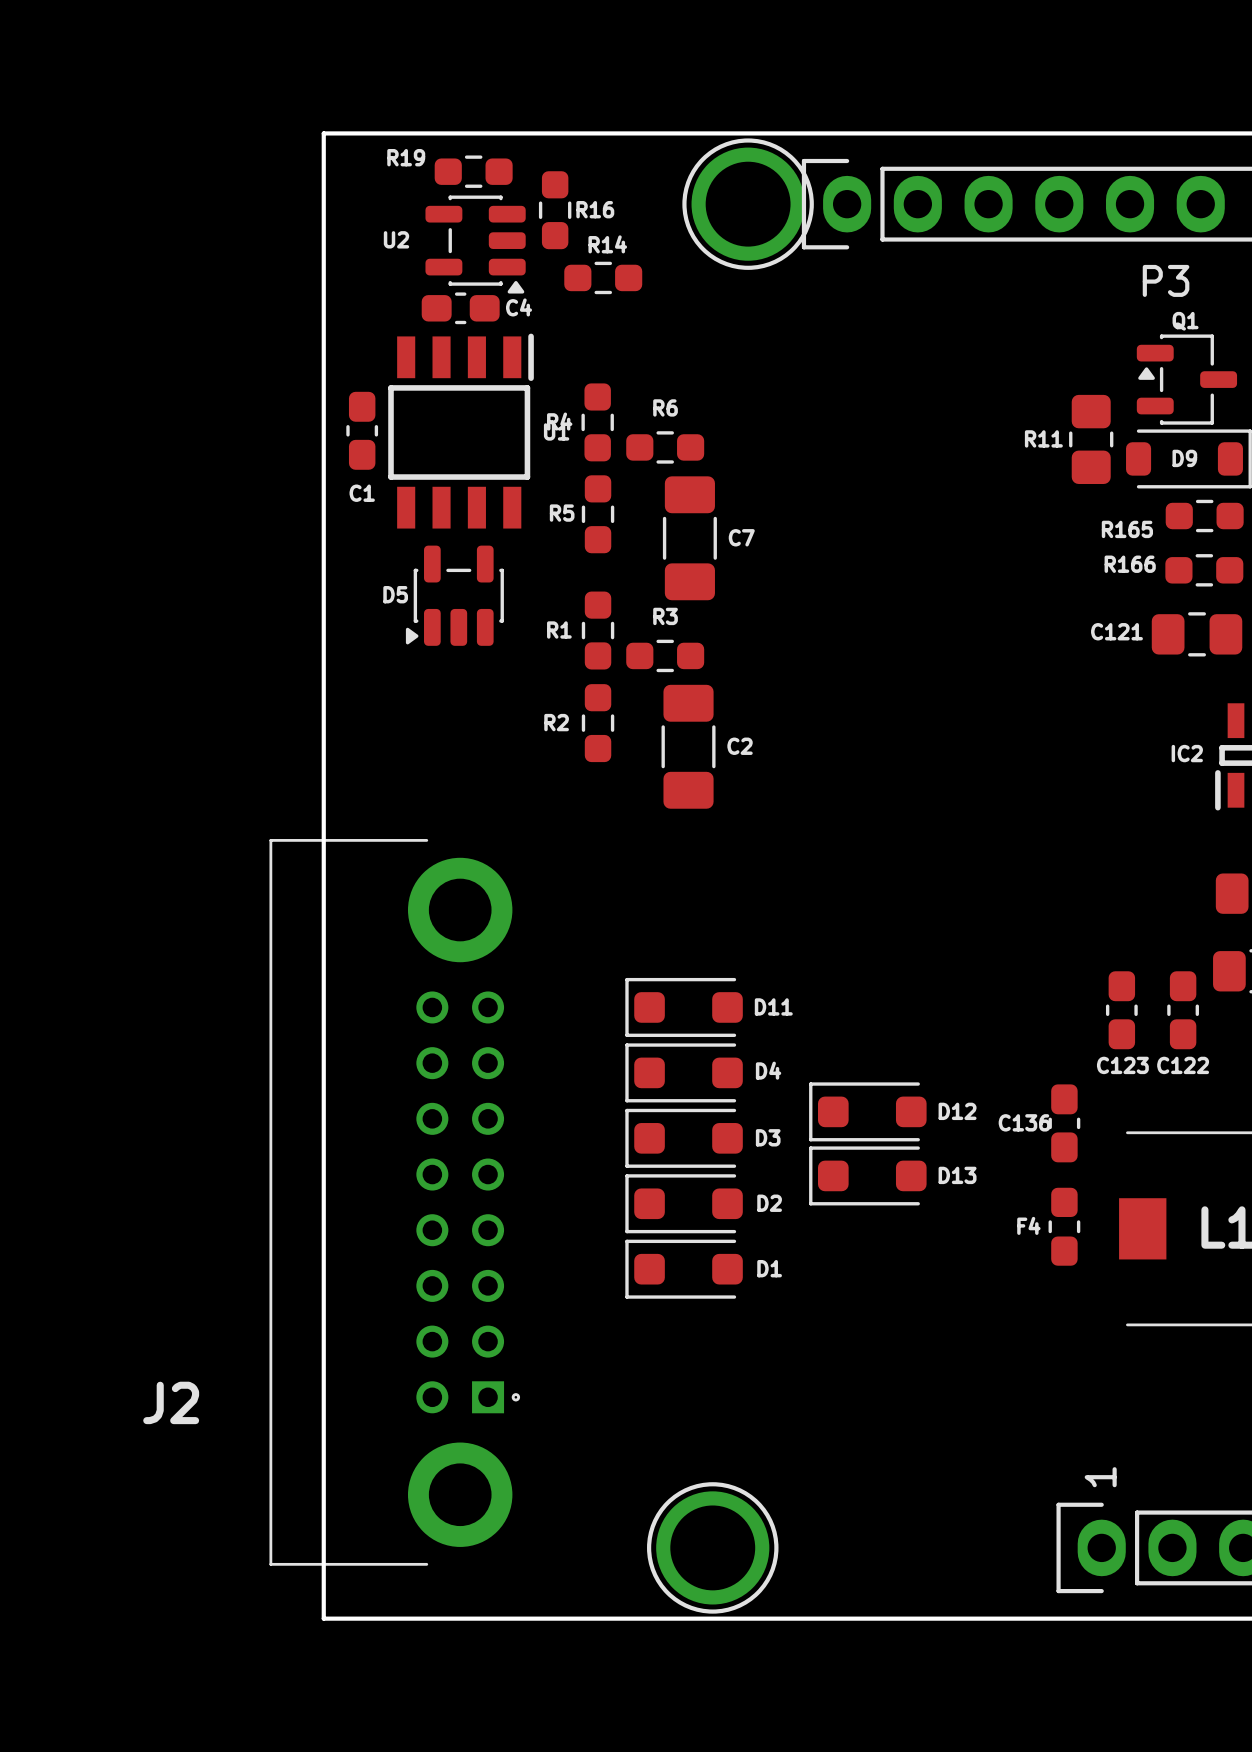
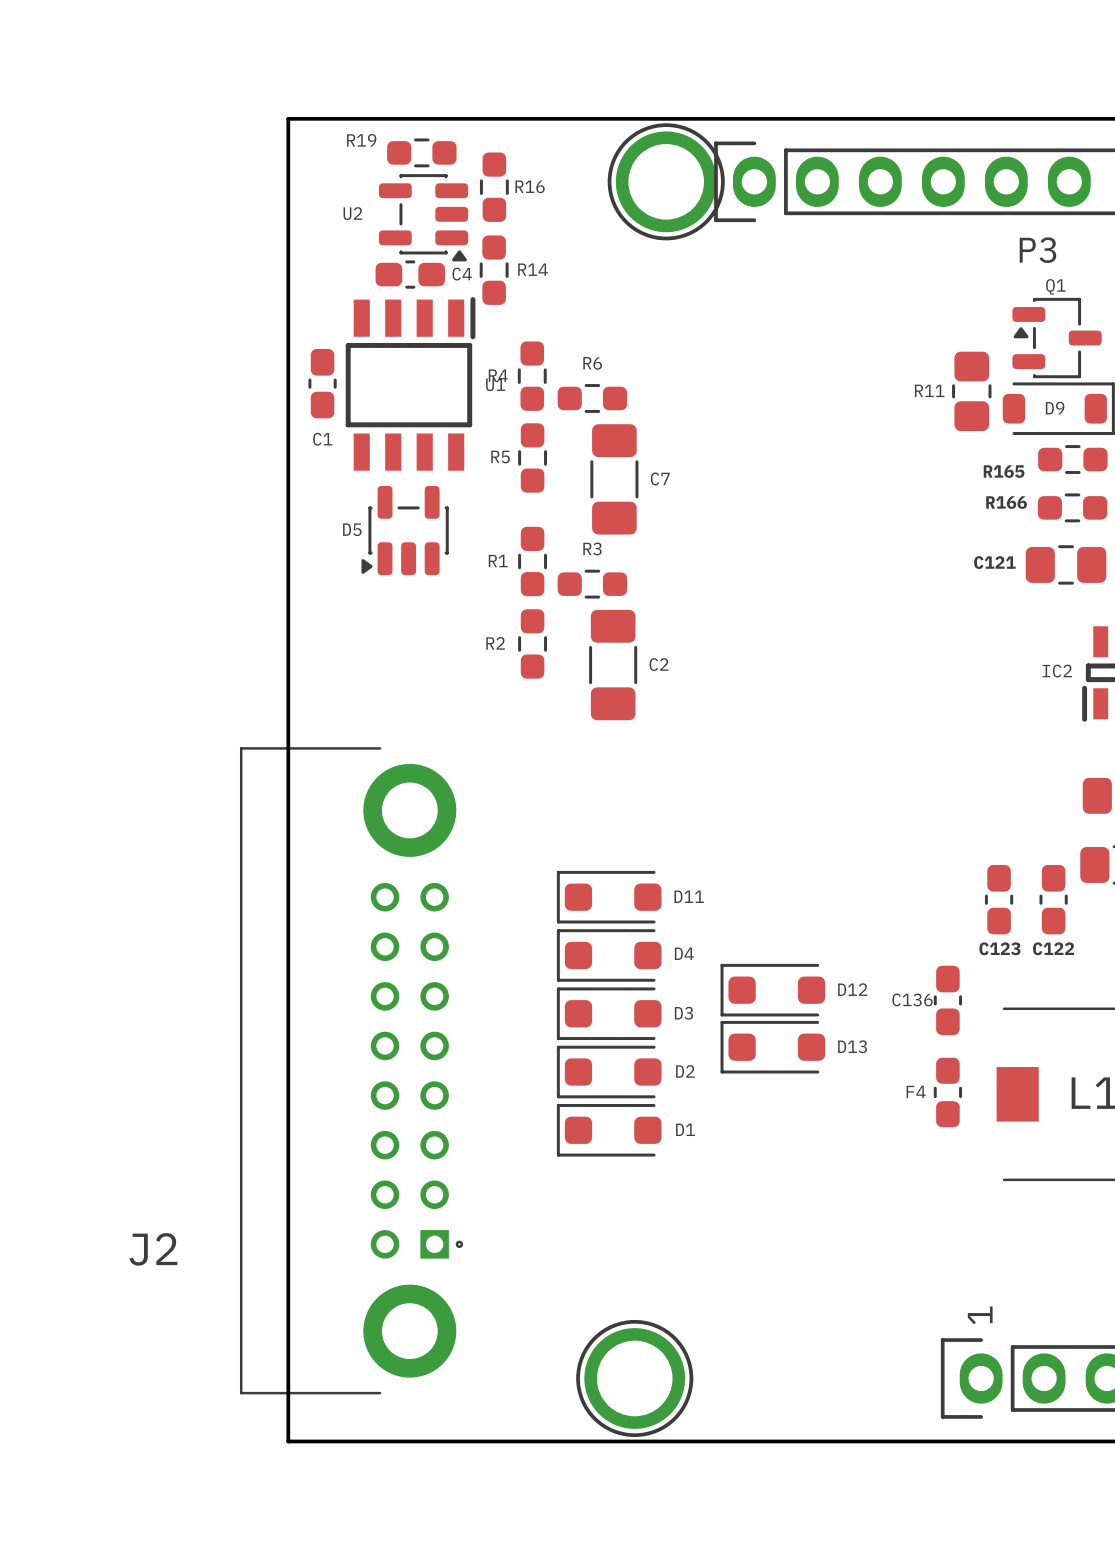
R14 rotation: 0° (603, 277) -> 90° clockwise (494, 270)
R14 position: (603, 277) -> (494, 270)

